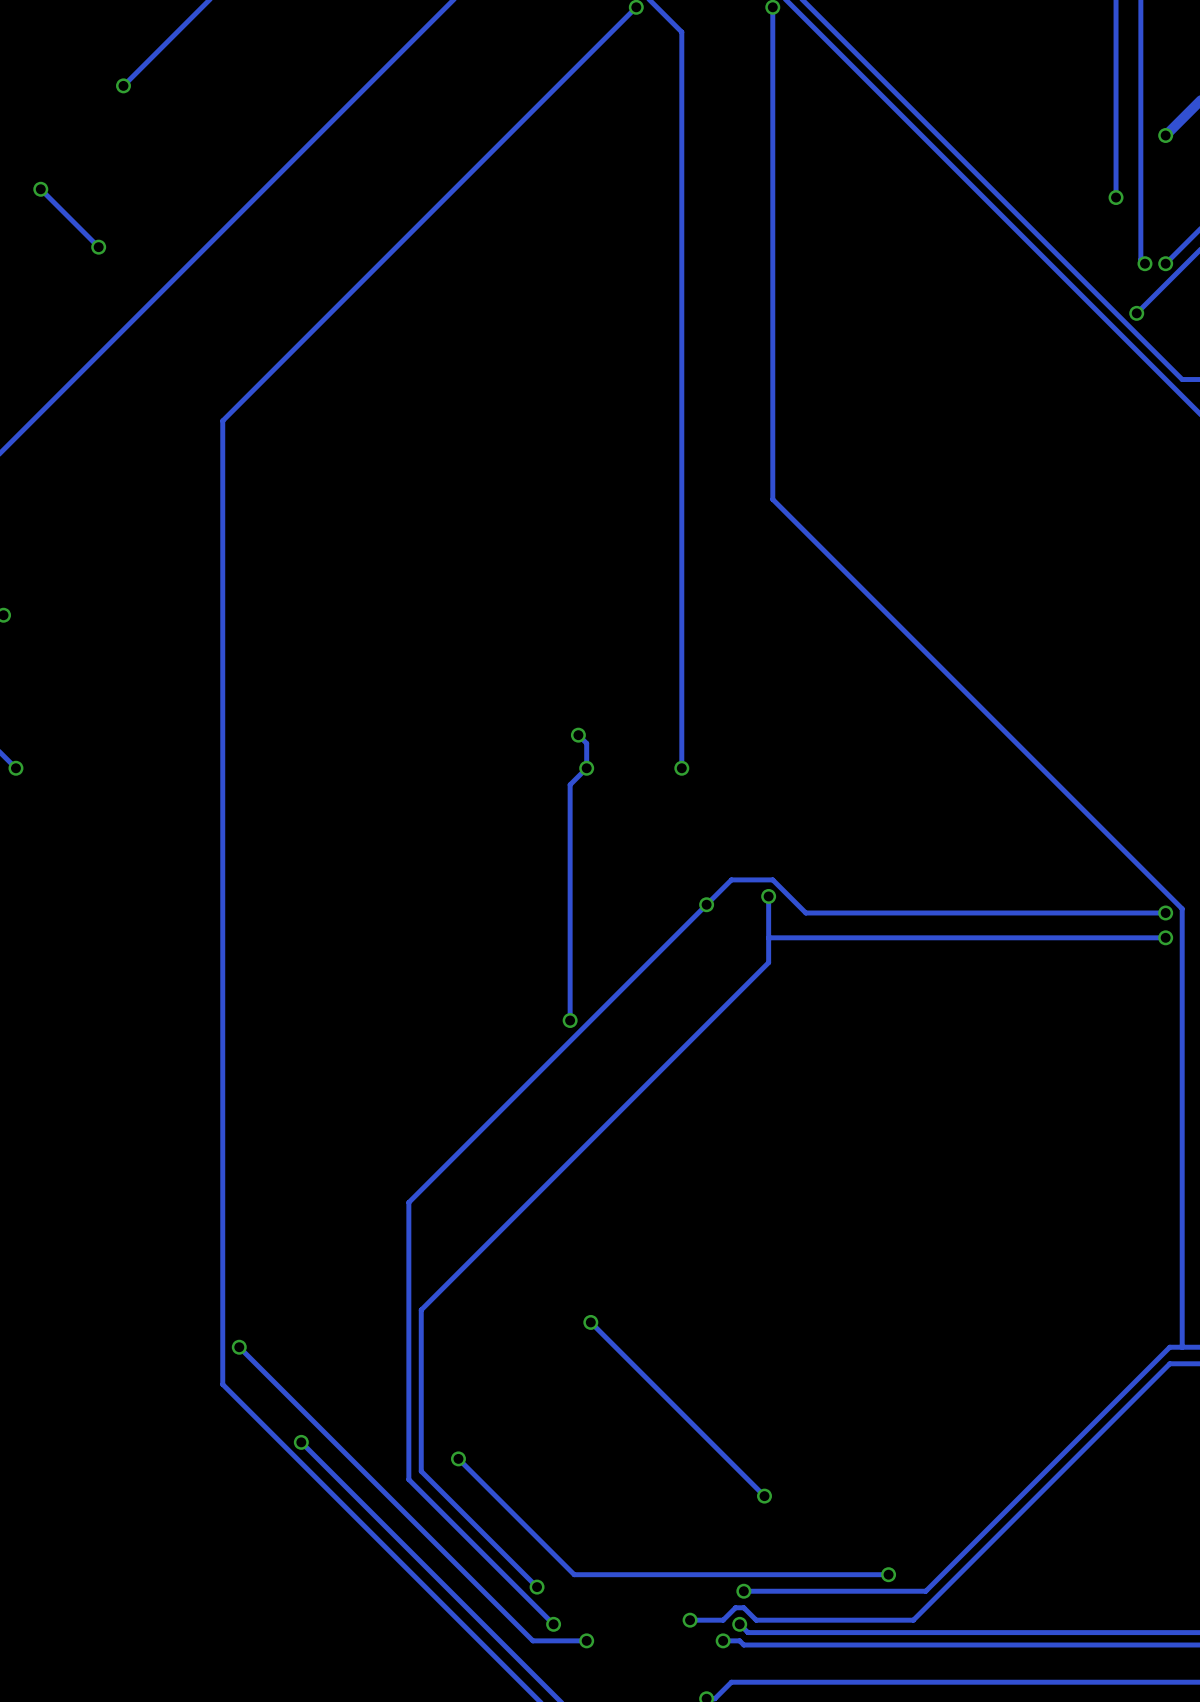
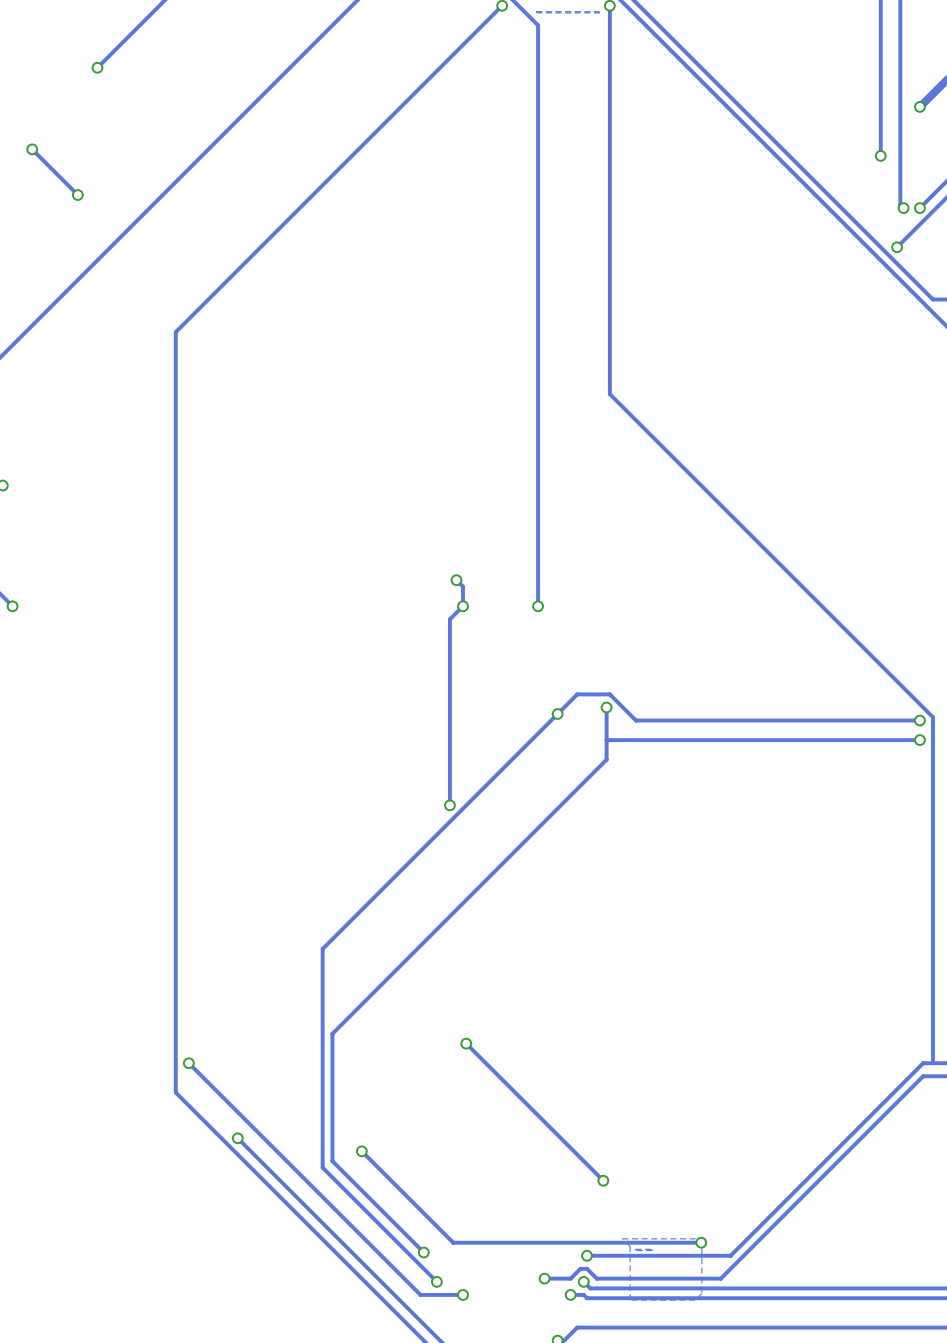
zone outline: none -> (598, 11) (536, 11) (599, 12) (598, 11)
zone outline: none -> (701, 1238) (701, 1293) (695, 1300) (630, 1300) (630, 1246) (622, 1238) (701, 1238)
zone outline: none -> (652, 1249) (635, 1249) (635, 1250) (652, 1250) (652, 1249)

